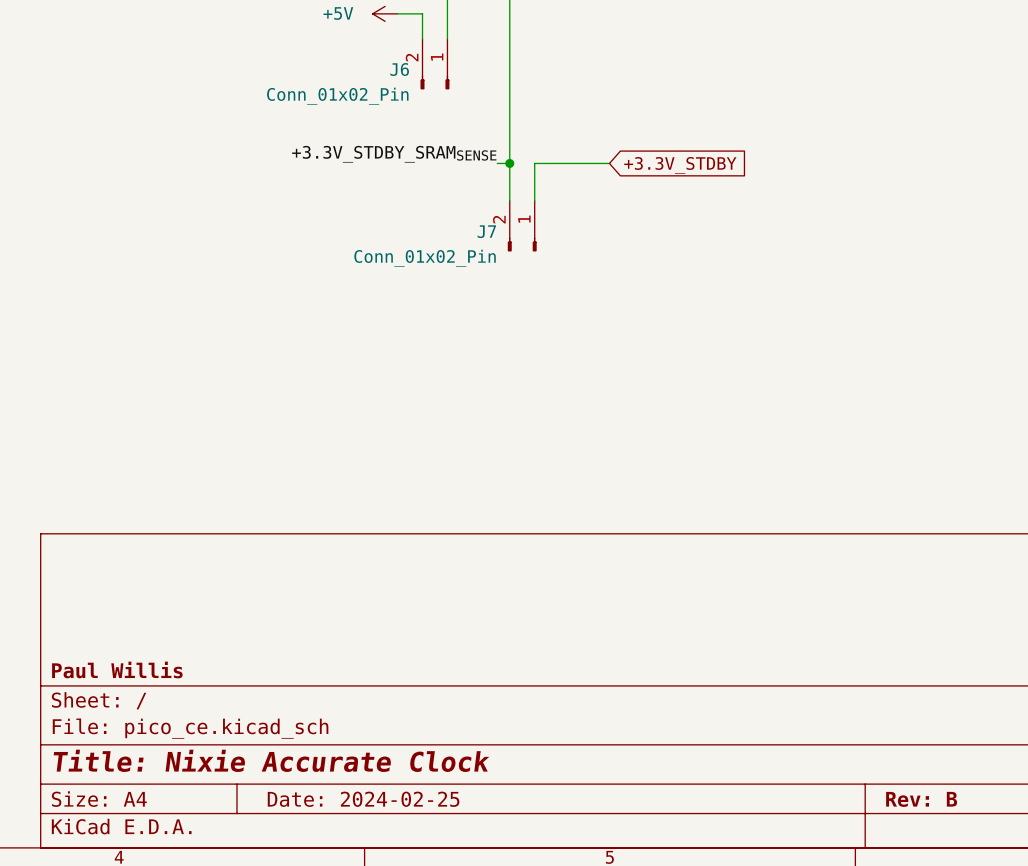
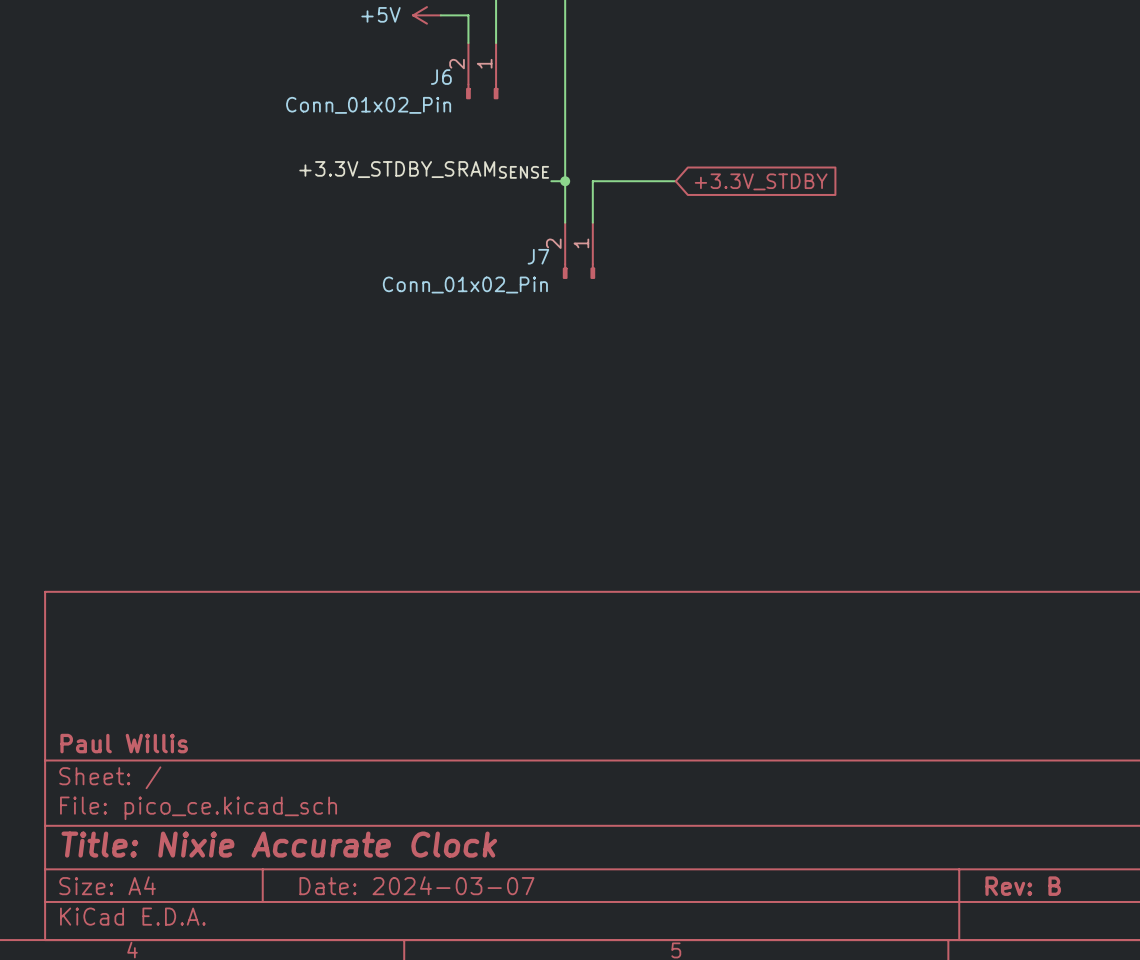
title block: Date: 2024-02-25 (363, 799) -> Date: 2024-03-07 (416, 885)

